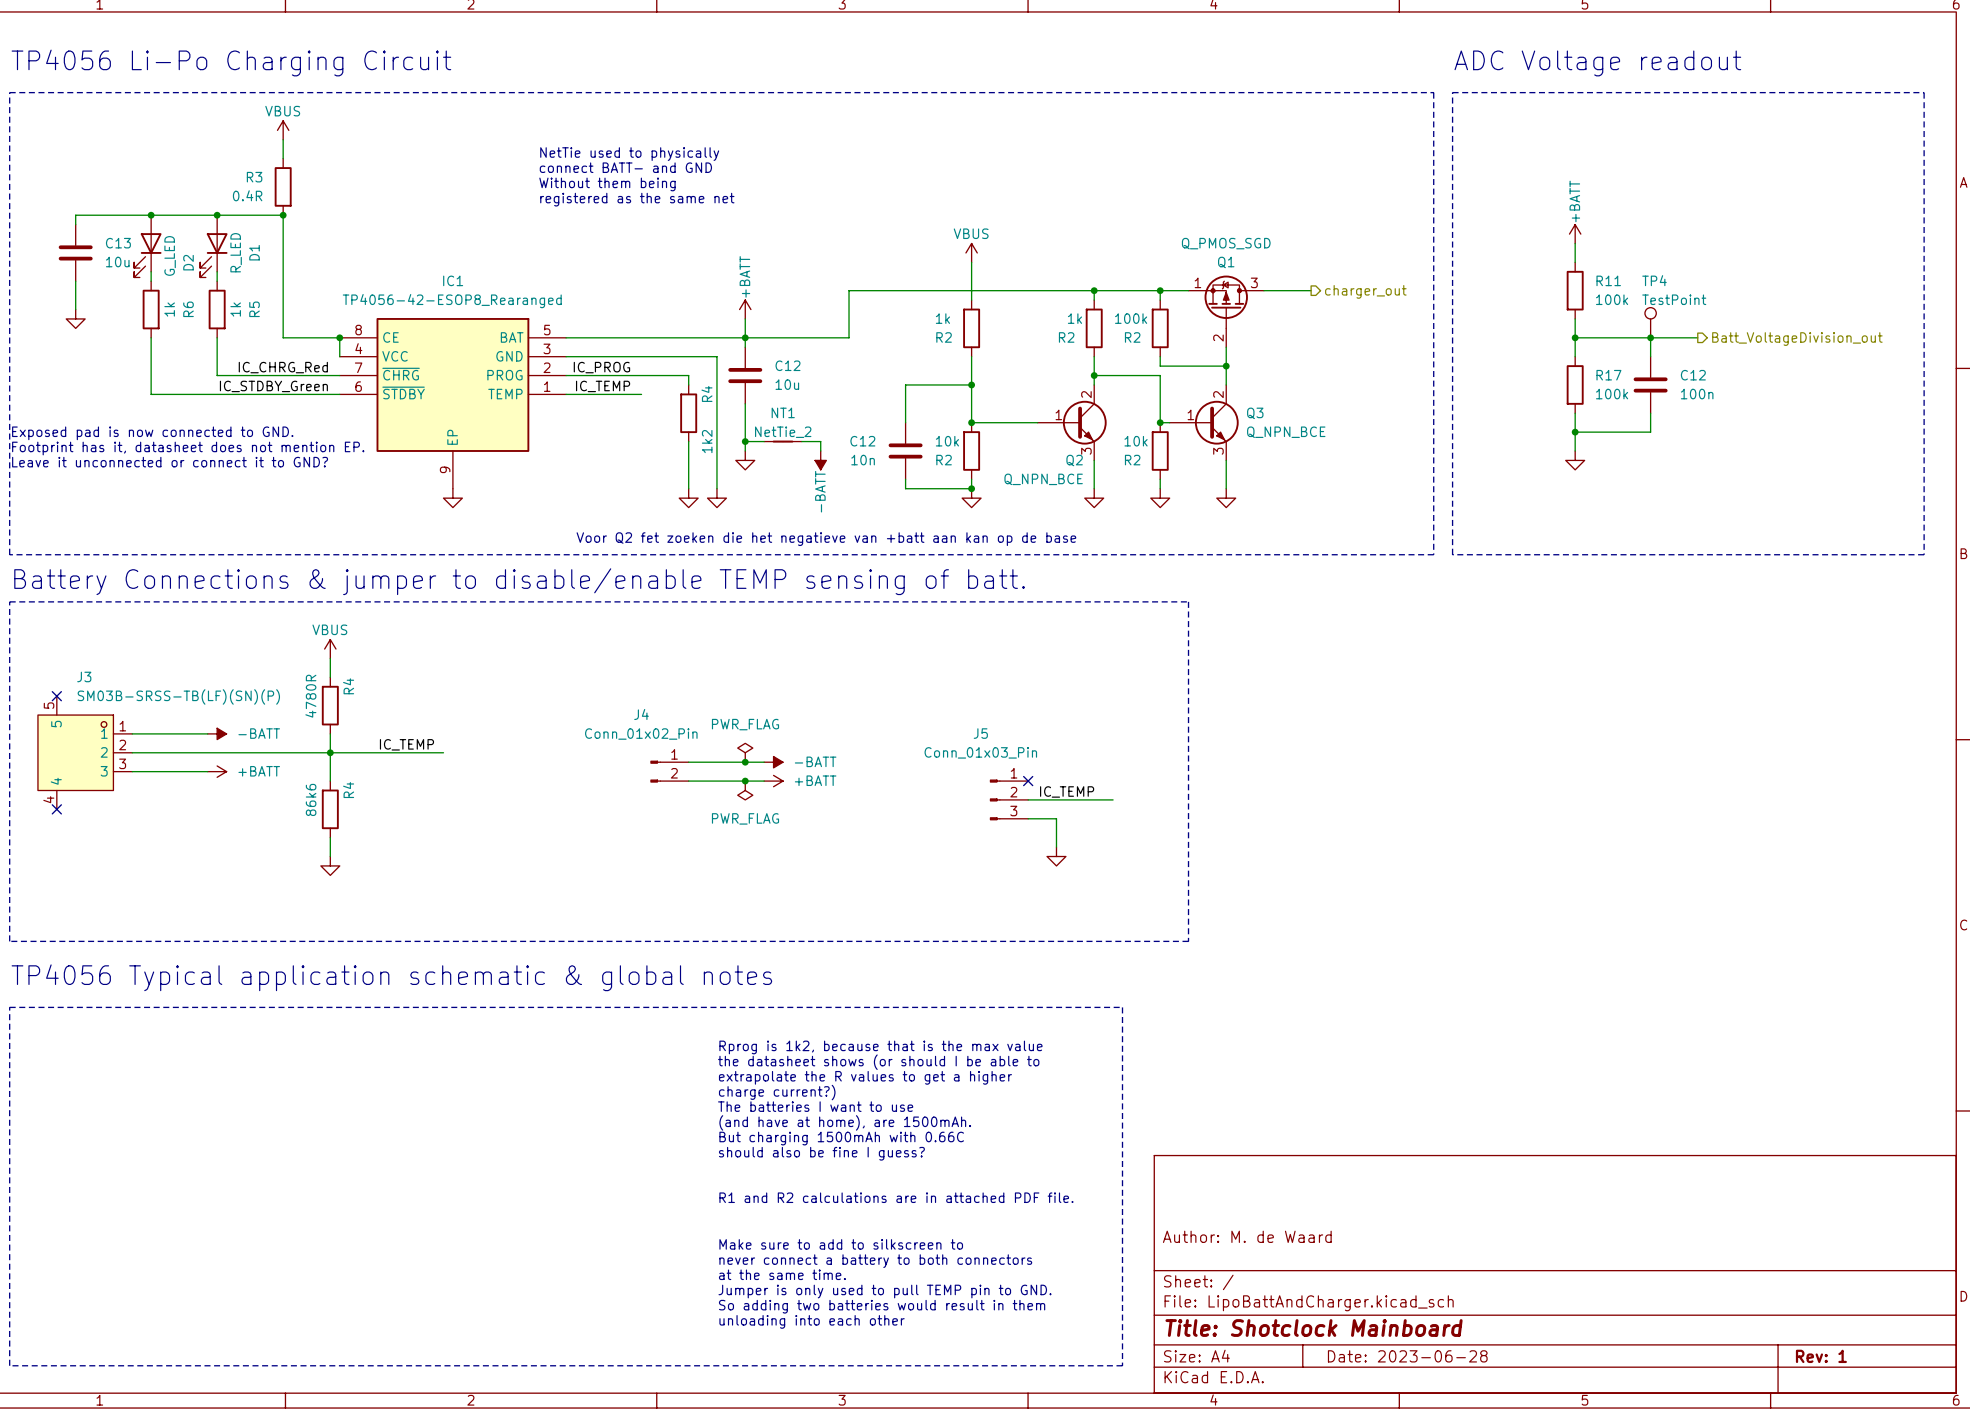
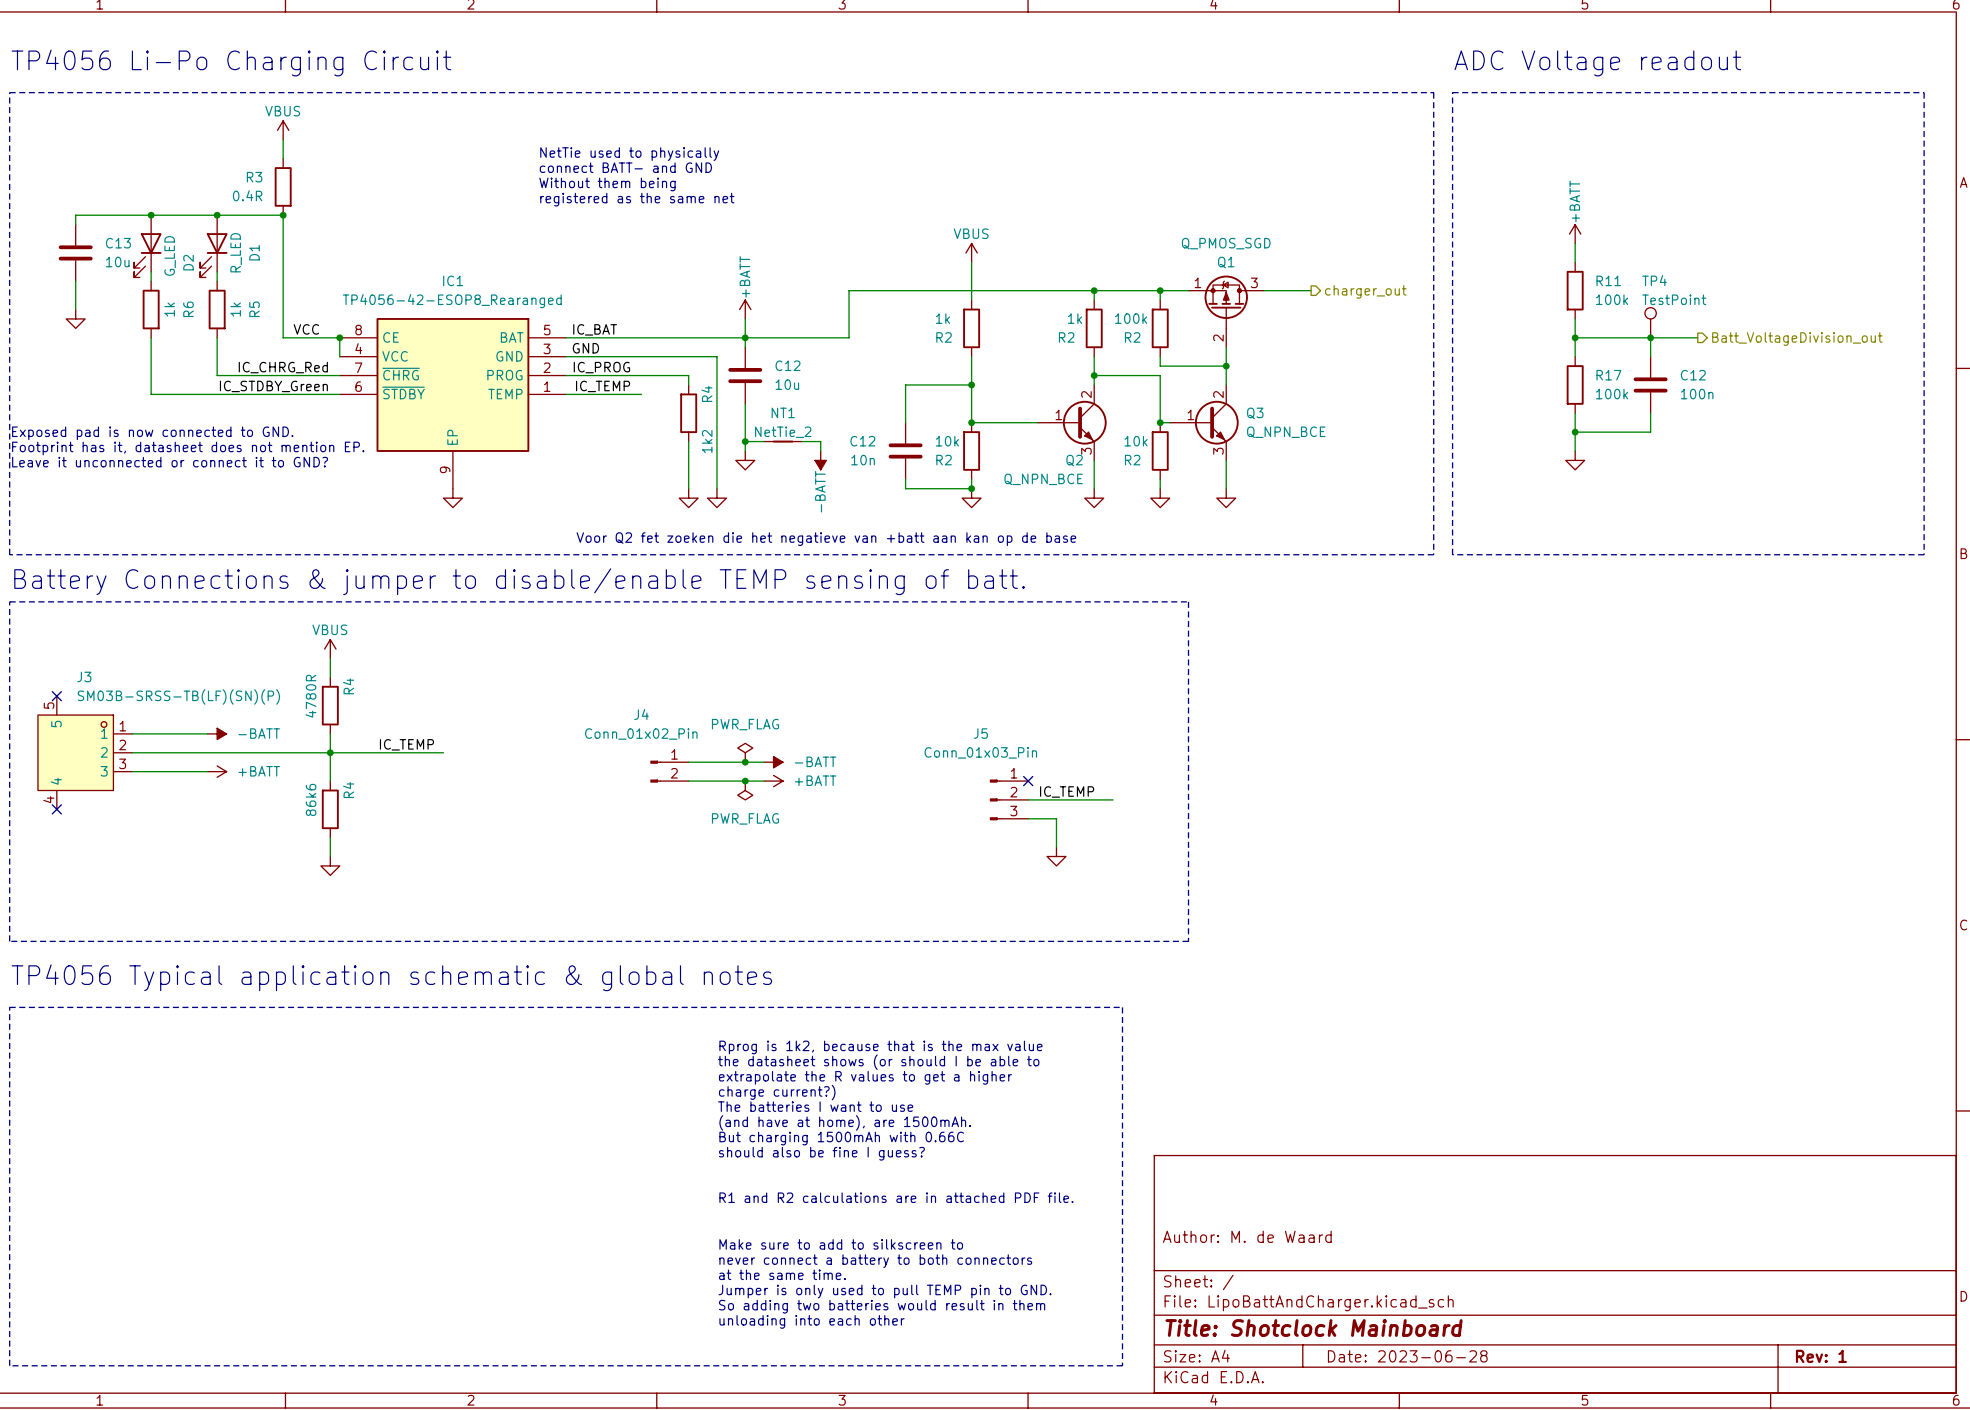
label: none -> VCC (306, 329)
label: none -> IC_BAT (595, 329)
label: none -> GND (585, 348)

